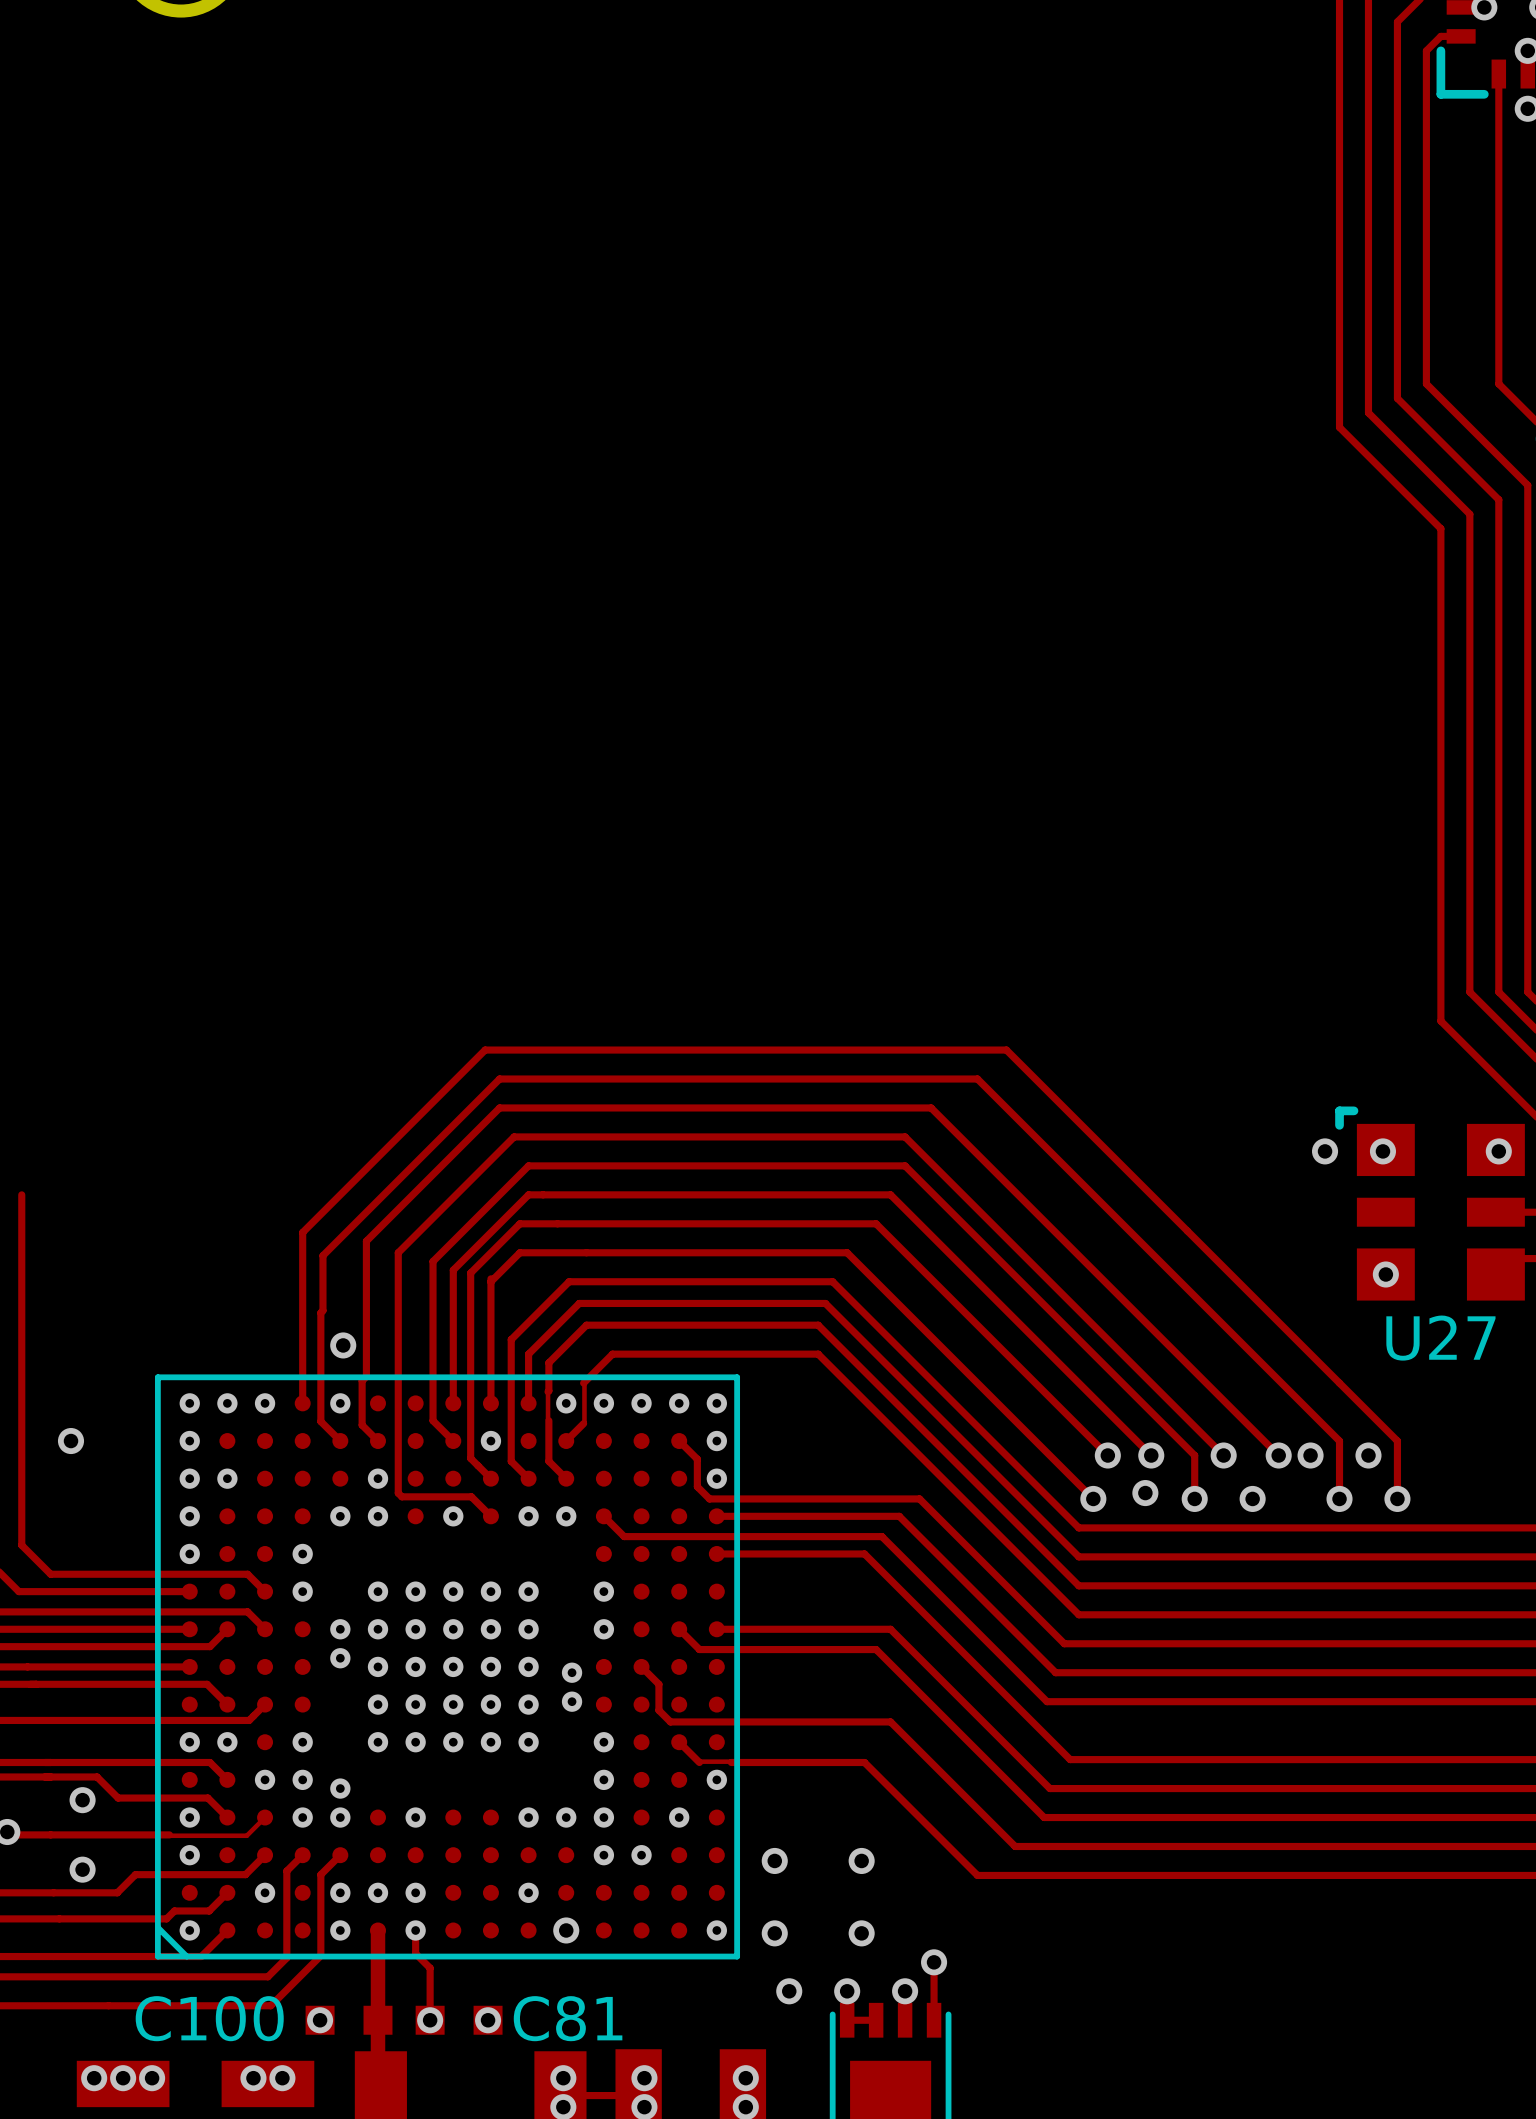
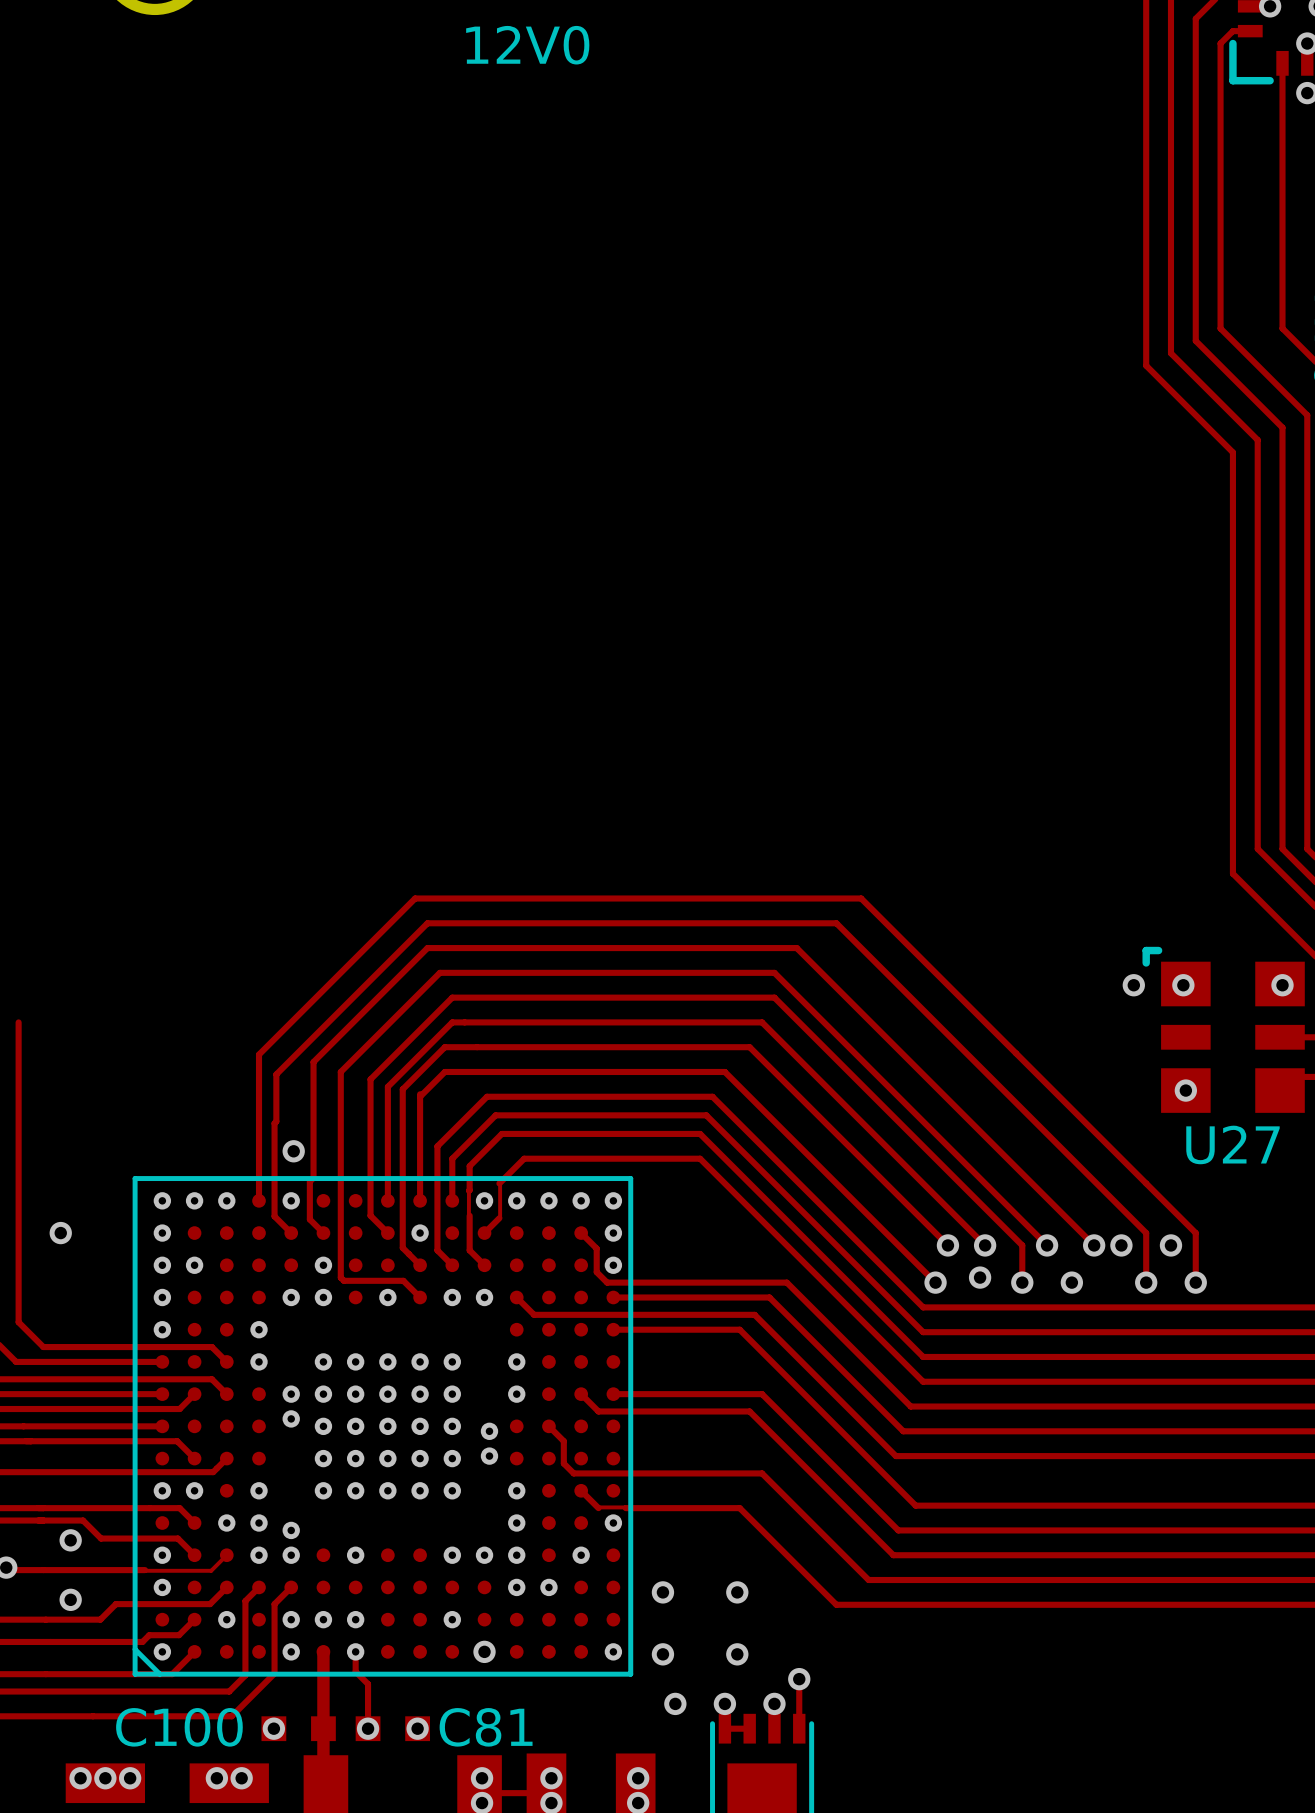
text: none -> 12V0 (527, 45)

